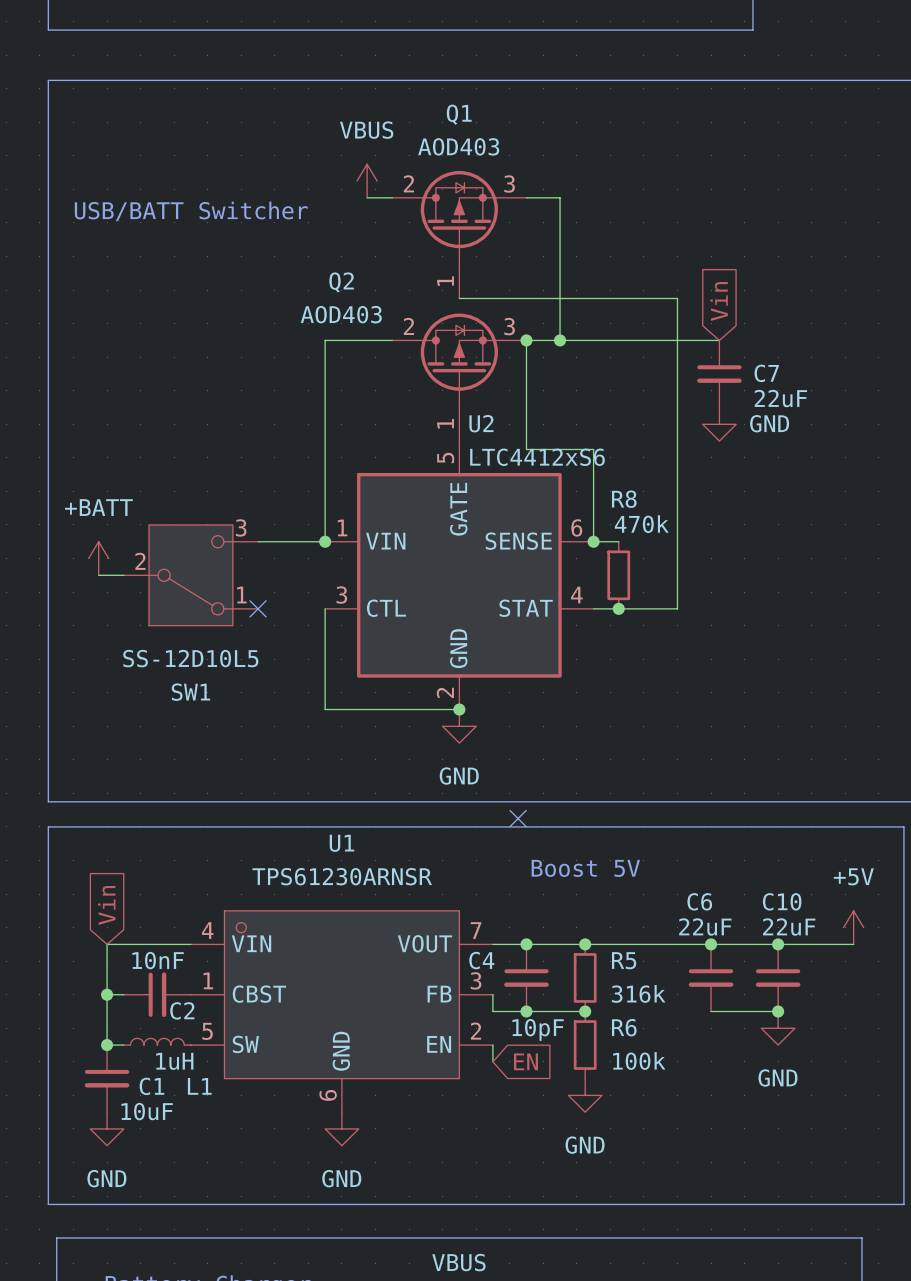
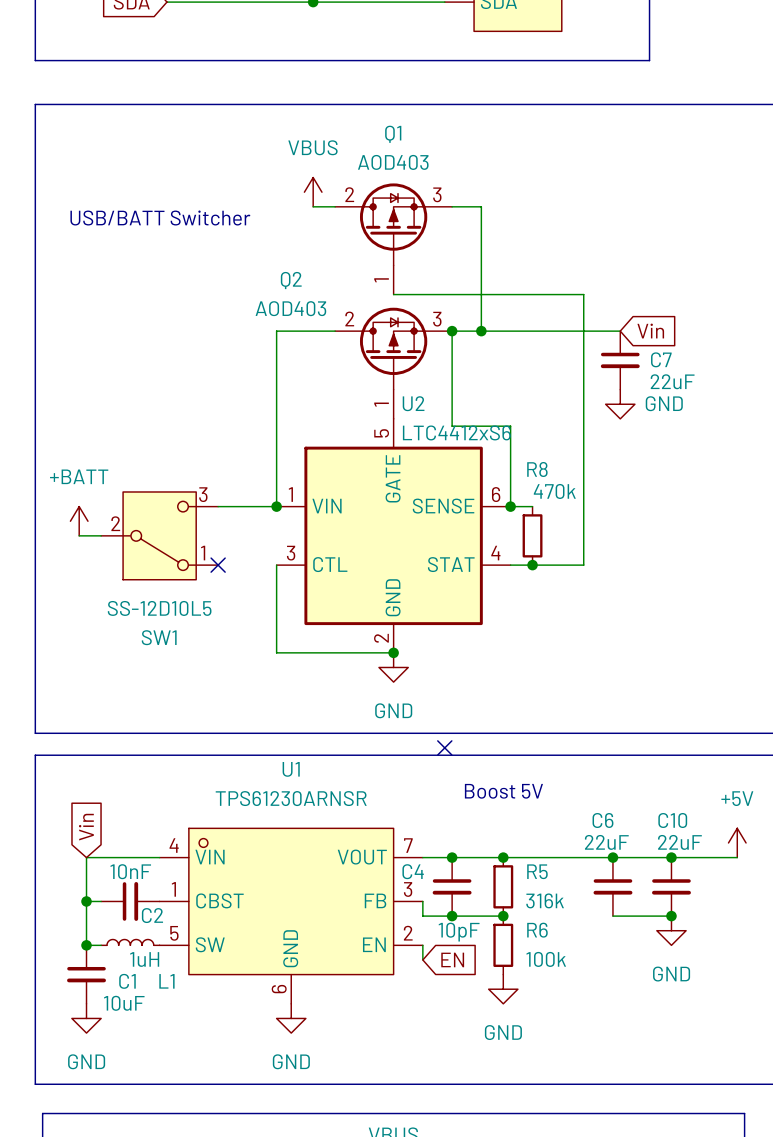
global label rotation: 0° (719, 301) -> 90° clockwise (650, 331)

